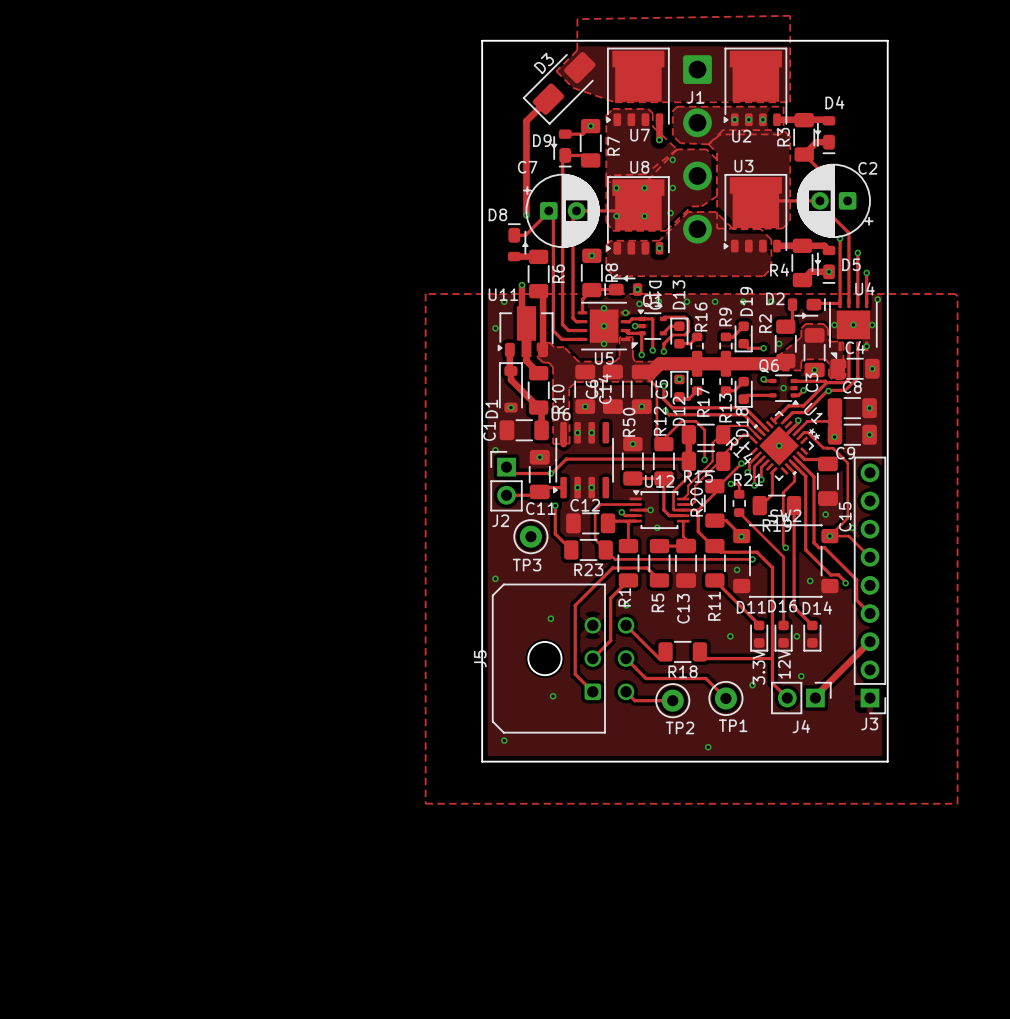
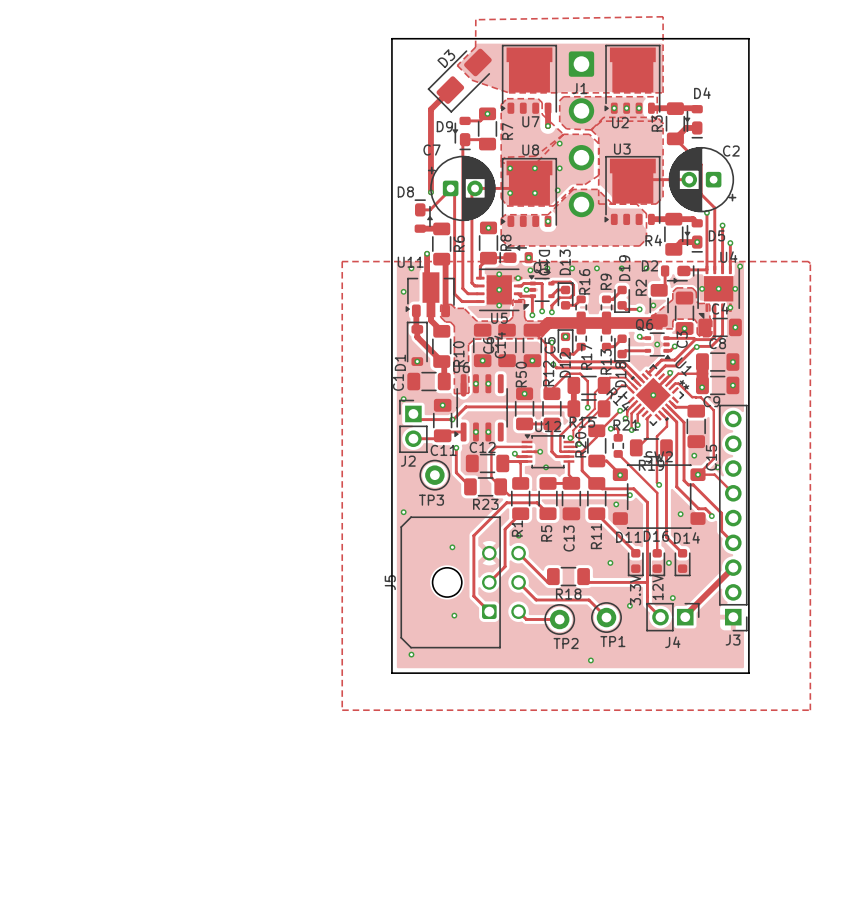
via: none -> (570, 438)
via: none -> (579, 443)

